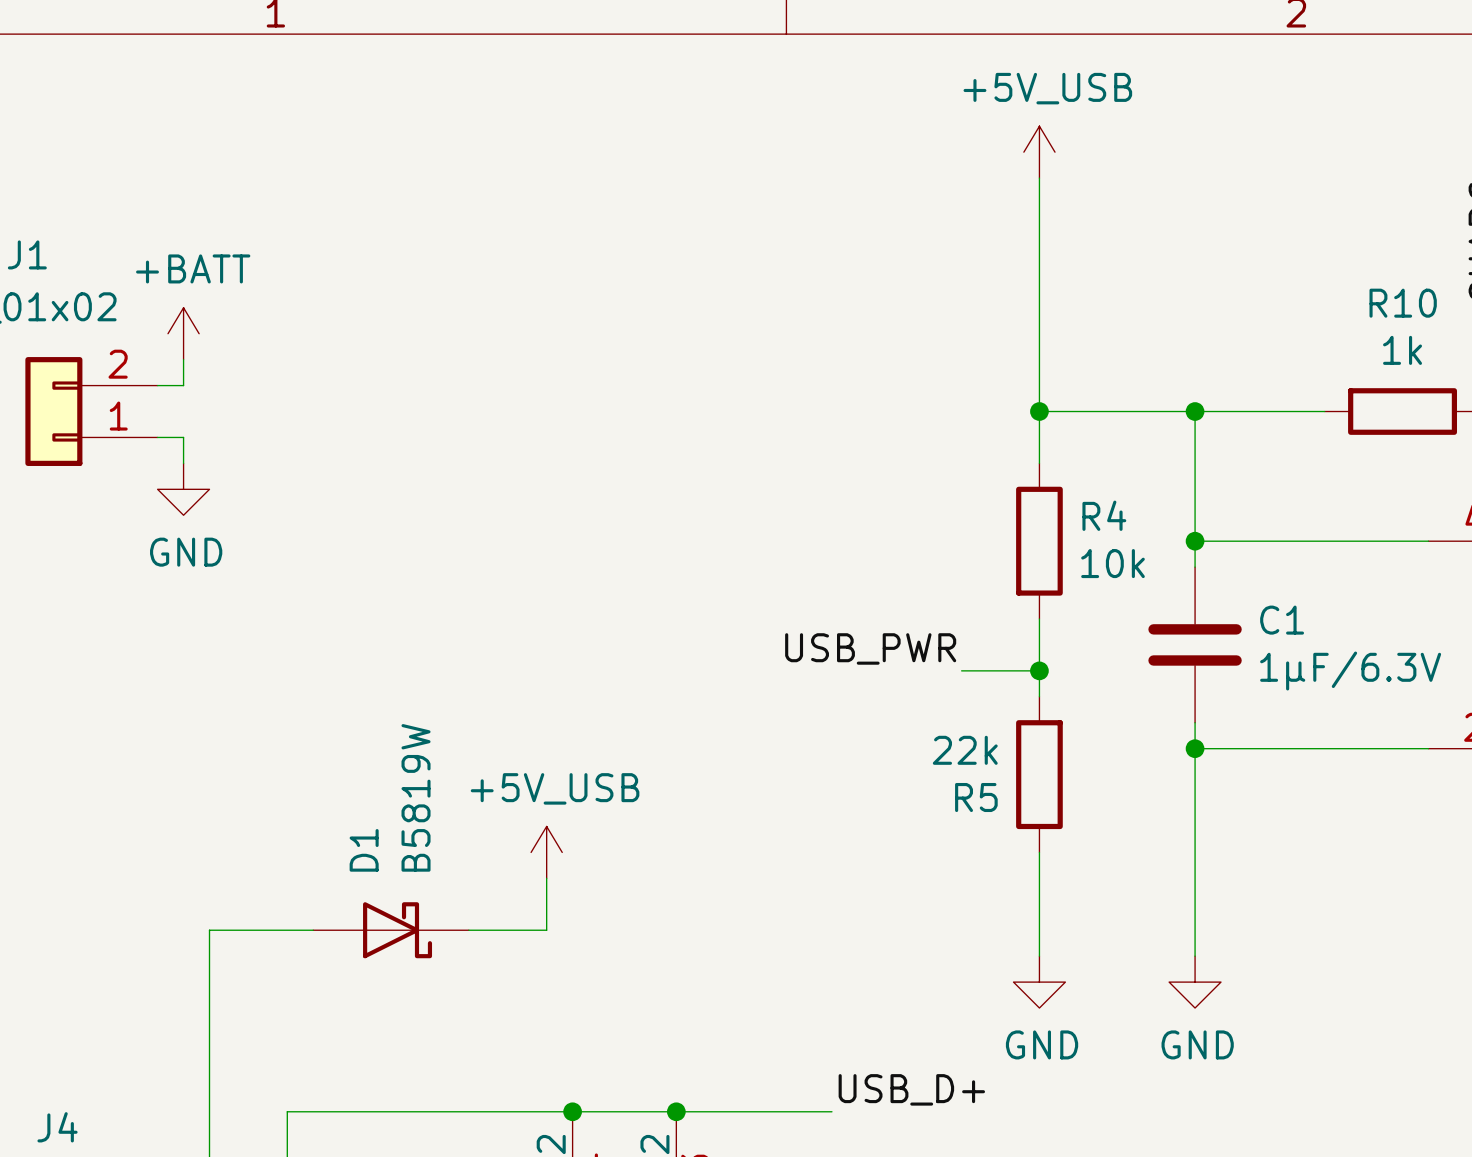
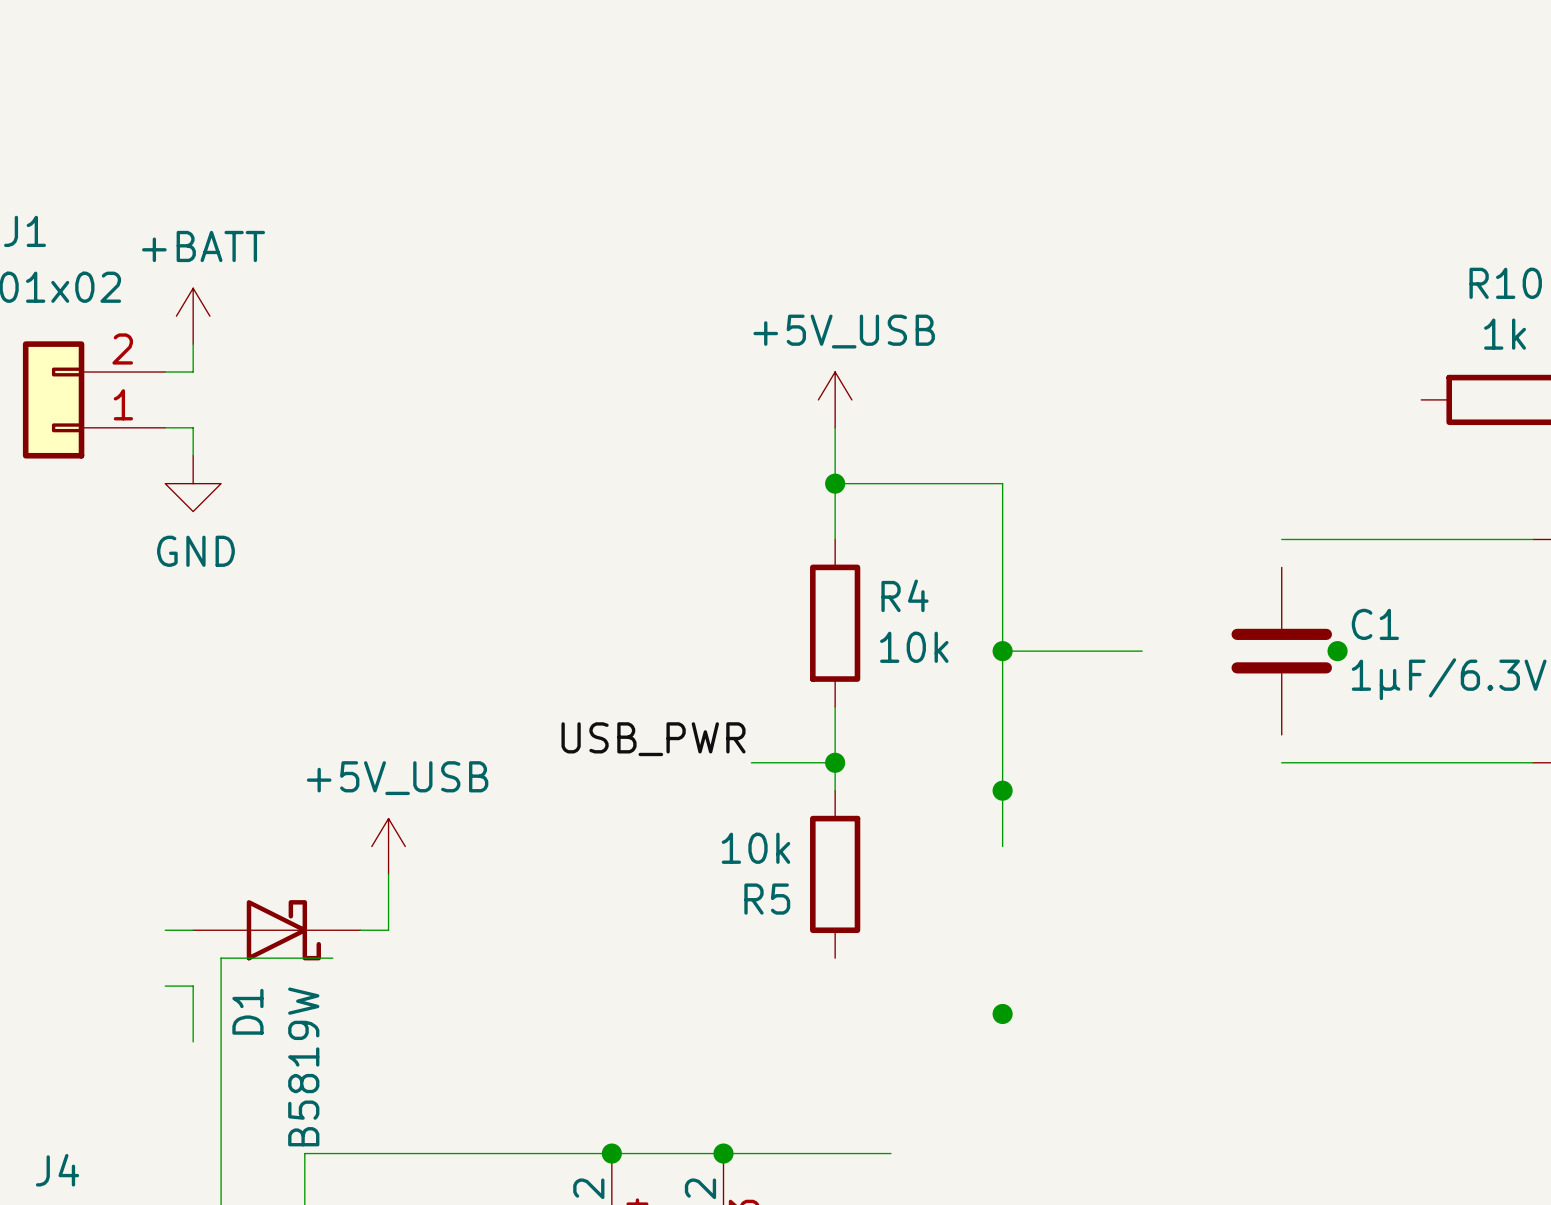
power symbol: +5V_USB (1039, 152) -> none
wire: (1039, 178) (1039, 463) -> none
power symbol: none -> +5V_USB (835, 399)
wire: (1039, 411) (1324, 411) -> none
junction: (1039, 411) -> none
wire: (1195, 411) (1195, 567) -> none
junction: (1195, 411) -> none
wire: none -> (835, 483) (1002, 483) (1002, 846)
junction: none -> (835, 483)
R4 position: (1039, 541) -> (835, 623)
junction: (1195, 541) -> none
wire: (1039, 619) (1039, 696) -> (835, 706) (835, 790)
wire: none -> (1002, 651) (1142, 651)
junction: none -> (1002, 651)
junction: none -> (1337, 651)
label position: USB_PWR (870, 648) -> USB_PWR (653, 739)
wire: (961, 670) (1039, 670) -> (751, 762) (835, 762)
junction: (1039, 670) -> none
wire: (1195, 722) (1195, 956) -> none
junction: none -> (835, 762)
junction: (1195, 748) -> none
R5 value: 22k (965, 750) -> 10k (755, 848)
junction: none -> (1002, 790)
R5 position: (1039, 774) -> (835, 874)
D1 value position: B5819W (416, 797) -> B5819W (303, 1066)
D1 name position: D1 (364, 850) -> D1 (247, 1011)
wire: none -> (388, 874) (388, 930) (360, 930)
power symbol position: +5V_USB (546, 852) -> +5V_USB (388, 846)
wire: (1039, 852) (1039, 956) -> (835, 427) (835, 539)
wire: (546, 878) (546, 930) (468, 930) -> none
wire: none -> (165, 930) (193, 930)
D1 position: (391, 930) -> (276, 930)
wire: none -> (165, 986) (193, 986) (193, 1041)
junction: none -> (1002, 1013)
power symbol: GND (1039, 982) -> none
power symbol: GND (1195, 982) -> none
label: USB_D+ (911, 1089) -> none

